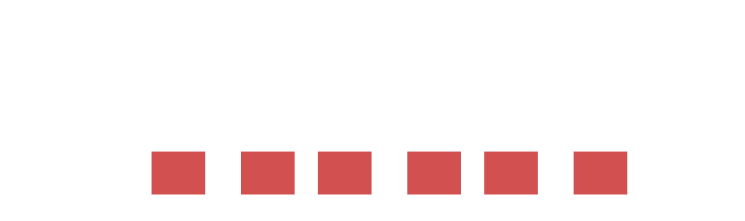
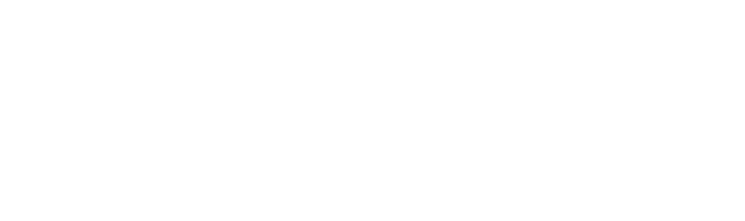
part: (223, 173) -> none
part: (389, 173) -> none
part: (555, 173) -> none

